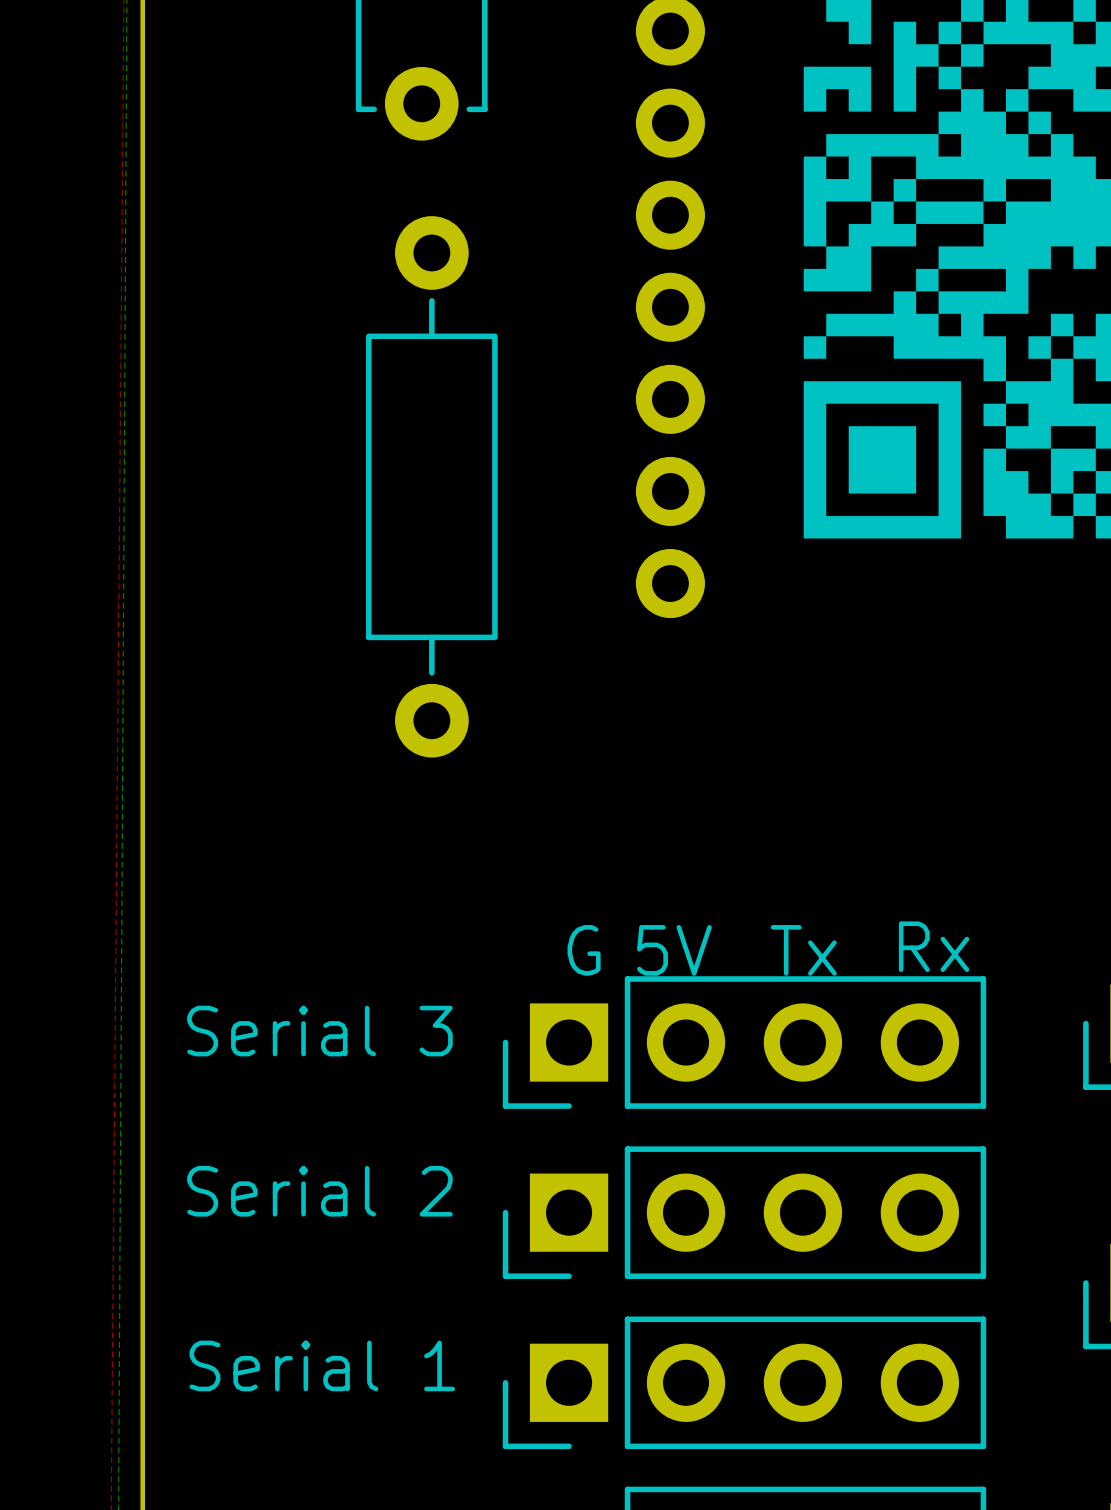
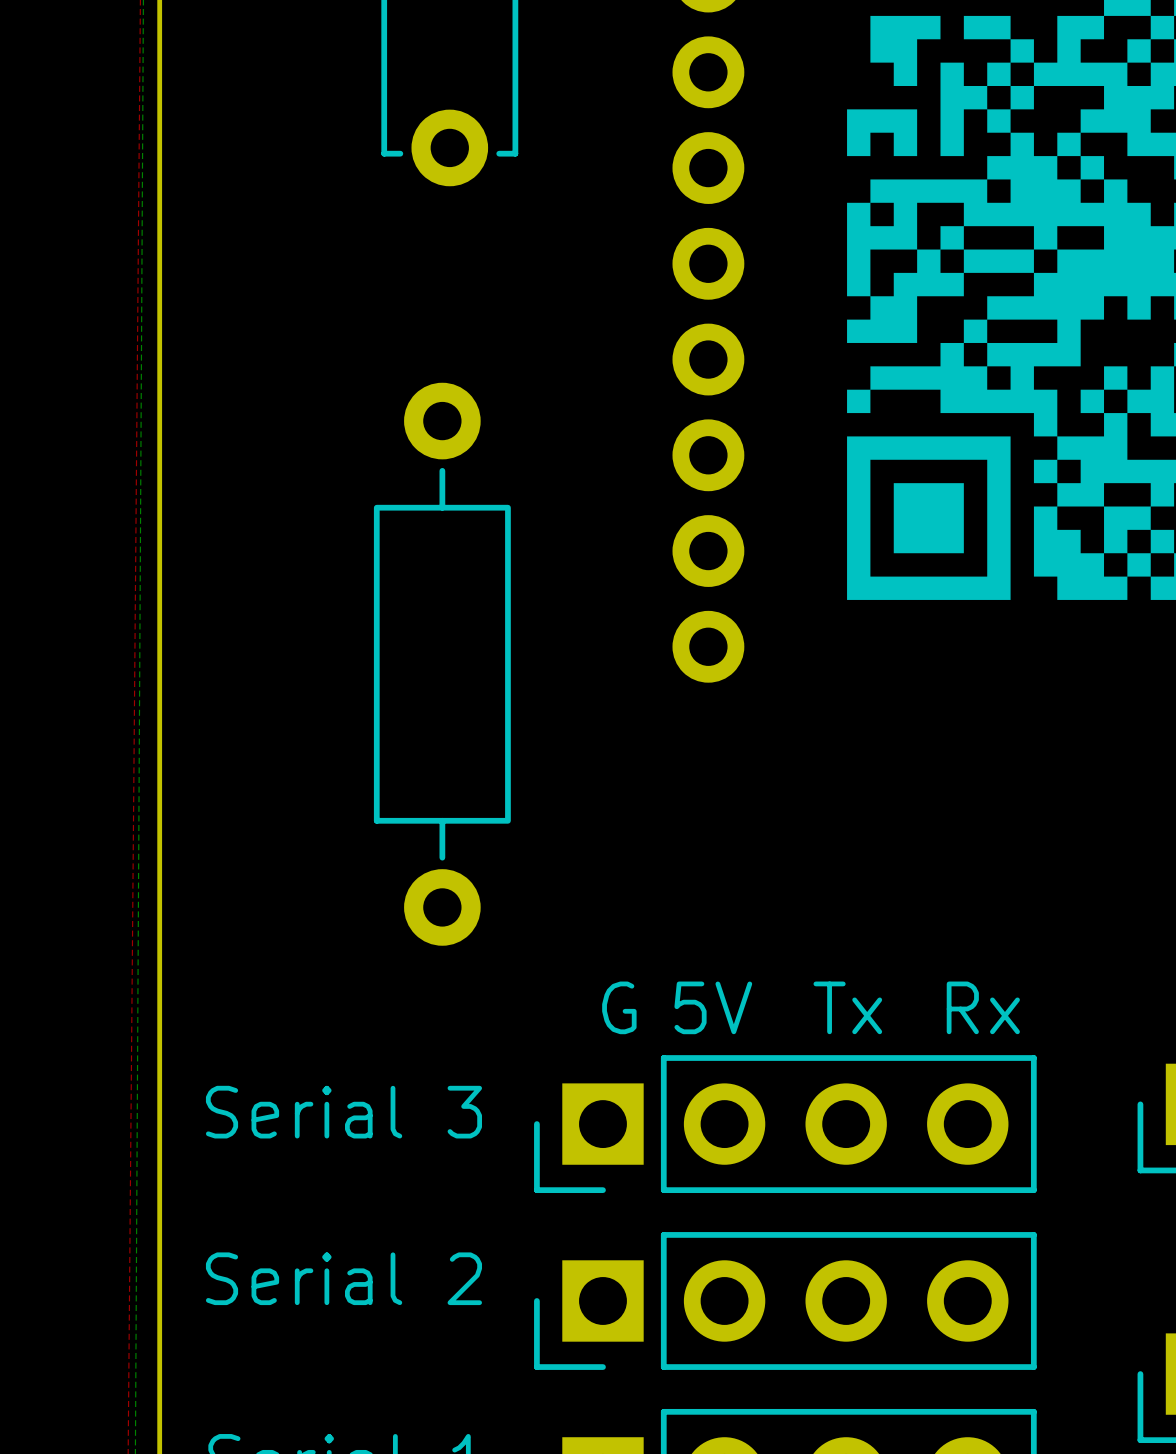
part position: (431, 486) -> (442, 664)
text position: Rx (934, 946) -> Rx (983, 1007)
text position: G (584, 950) -> G (619, 1007)
text position: 5V (674, 950) -> 5V (713, 1007)
text position: Tx (803, 950) -> Tx (847, 1007)

